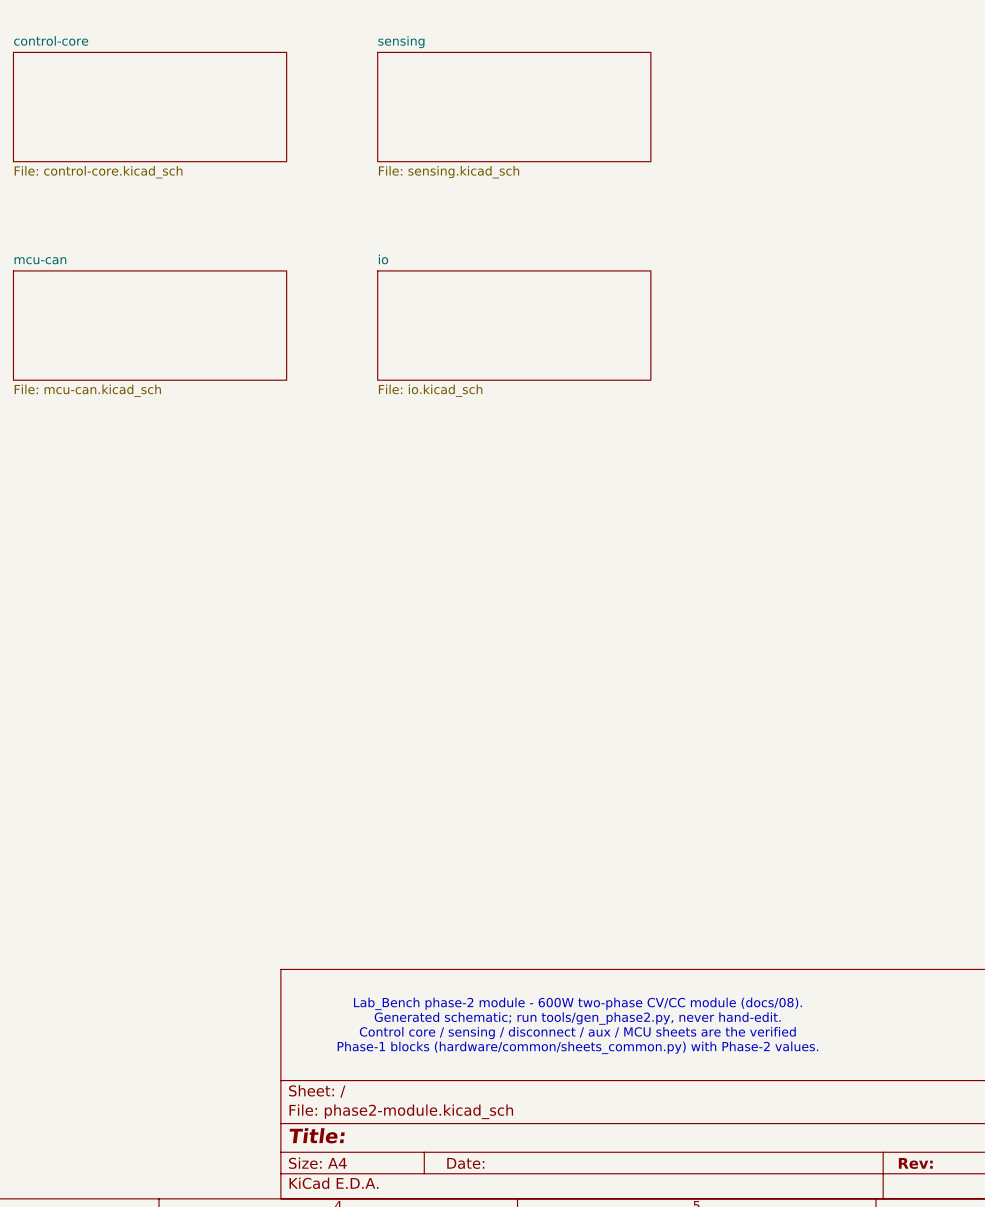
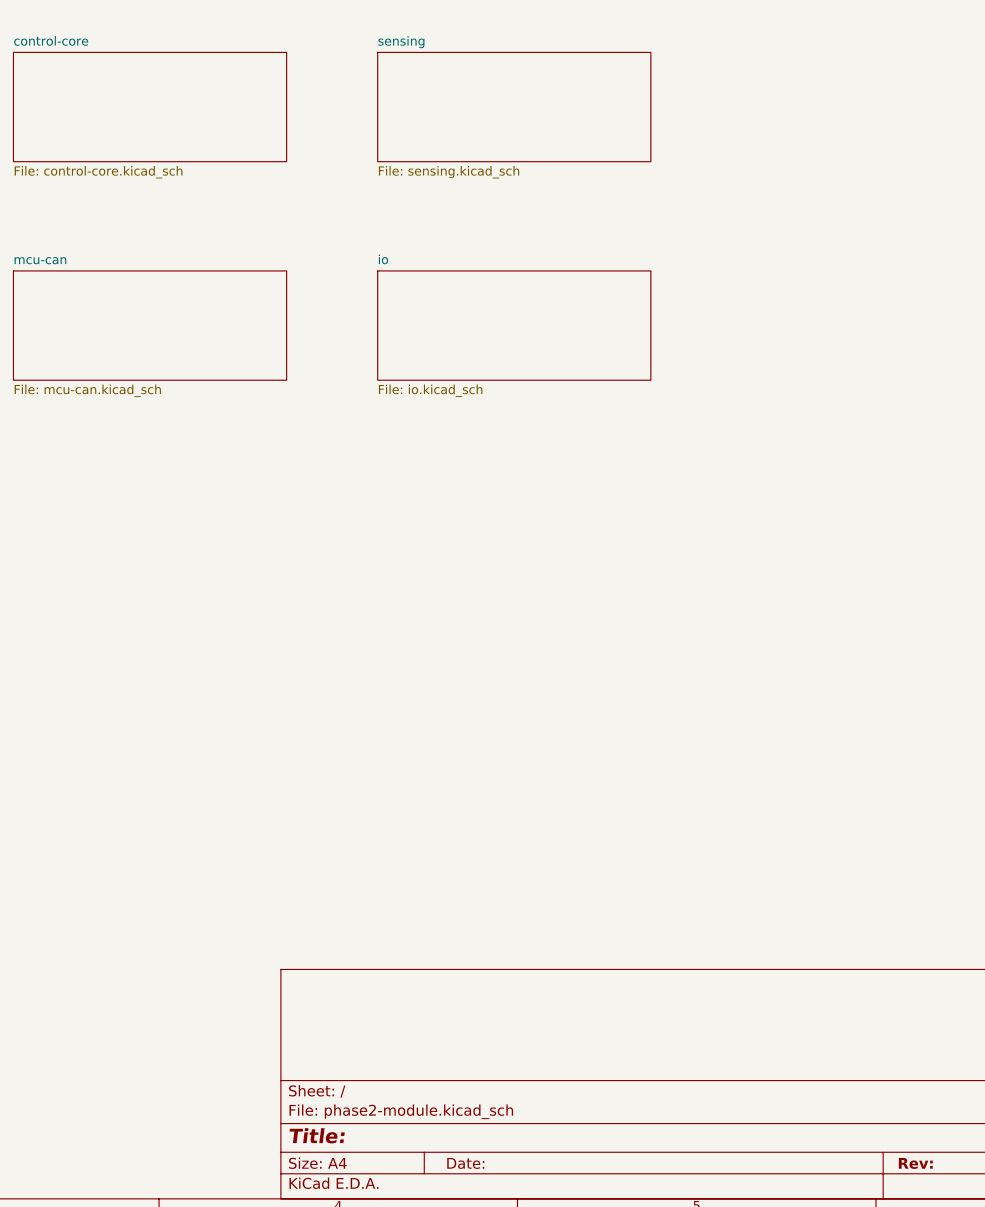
text: Lab_Bench phase-2 module - 600W two-phase CV/CC module (docs/08). (577, 1003) -> none
text: Generated schematic; run tools/gen_phase2.py, never hand-edit. (577, 1018) -> none
text: Control core / sensing / disconnect / aux / MCU sheets are the verified (577, 1033) -> none
text: Phase-1 blocks (hardware/common/sheets_common.py) with Phase-2 values. (577, 1047) -> none

